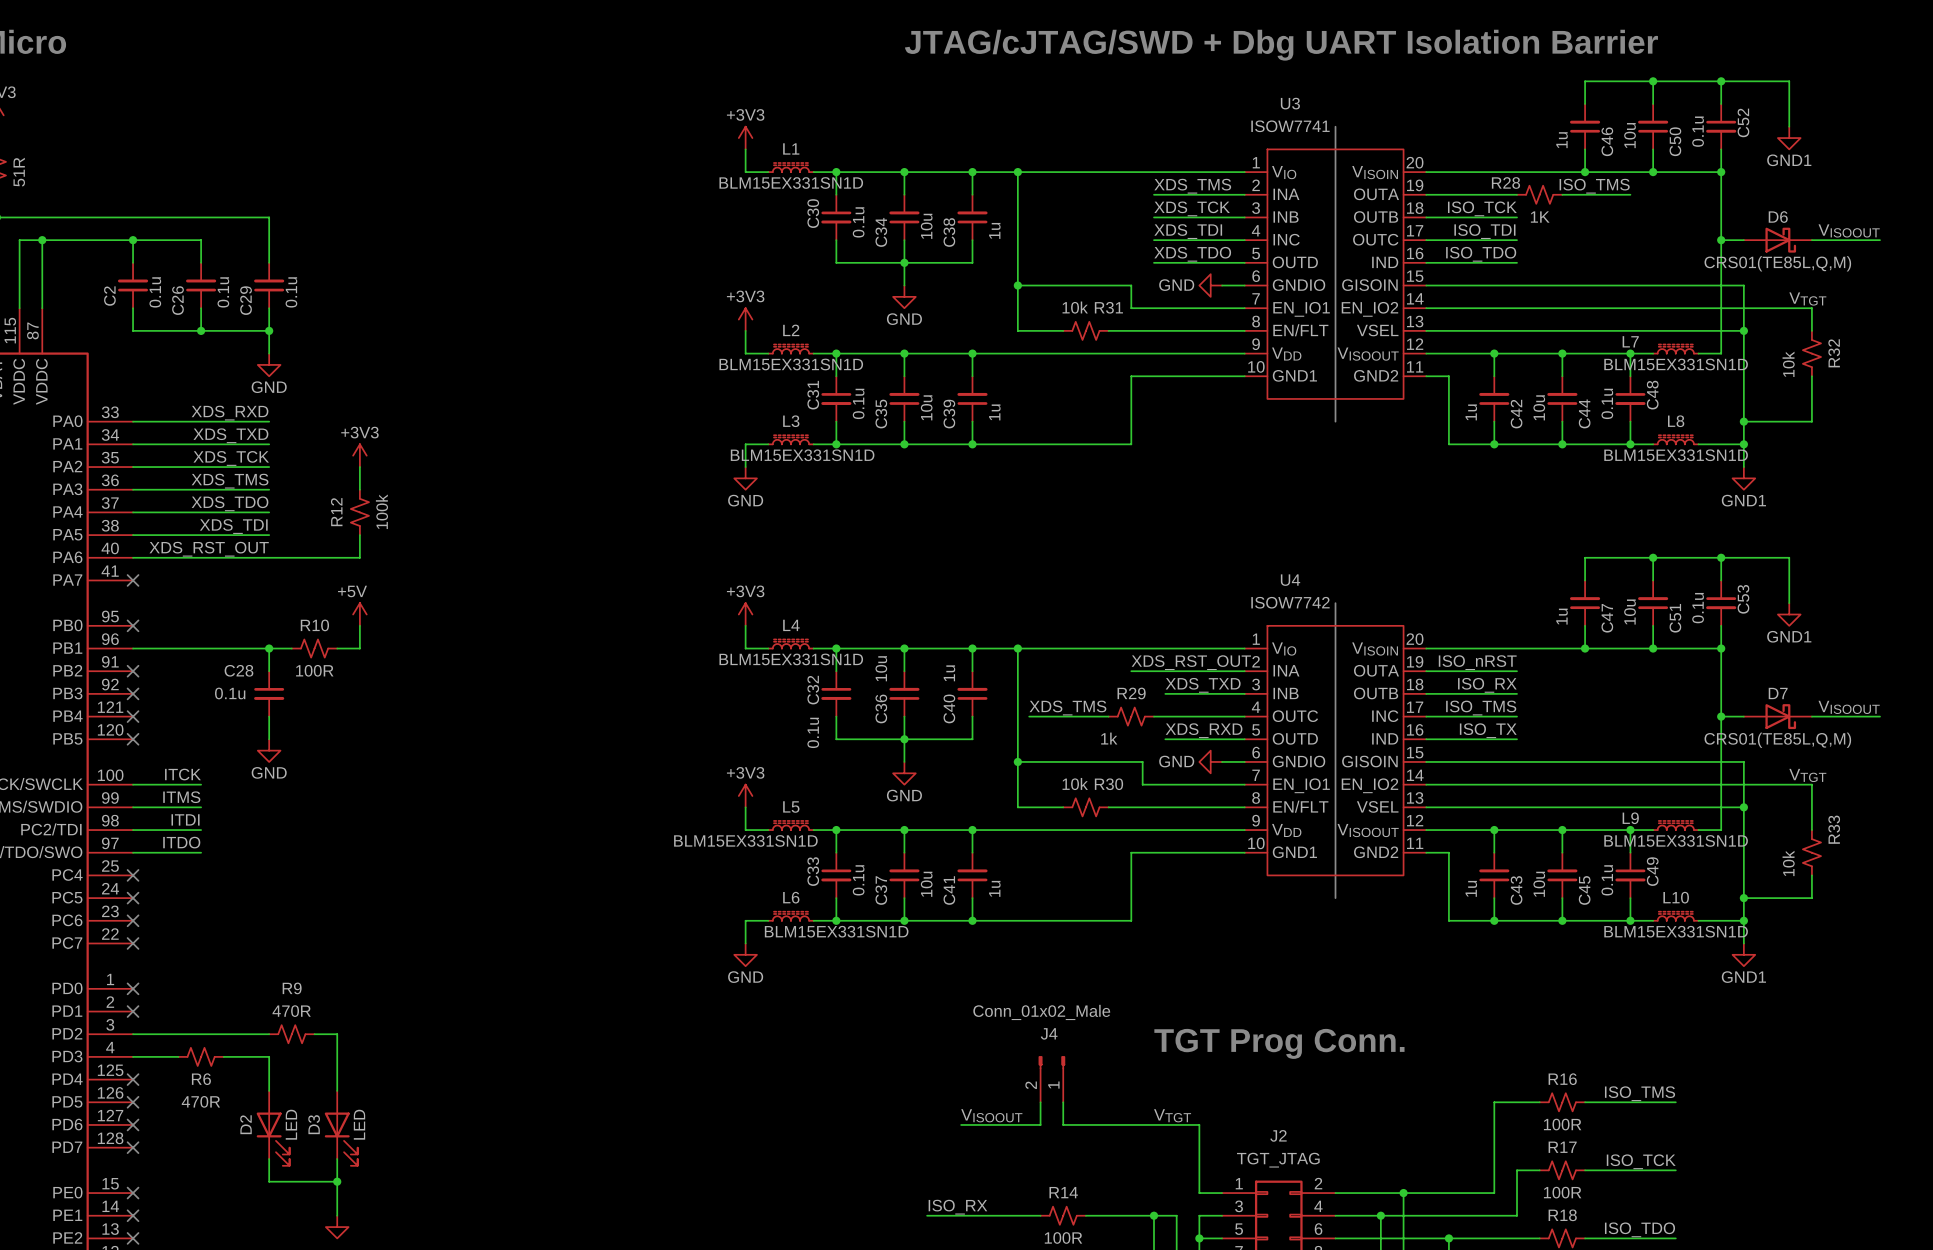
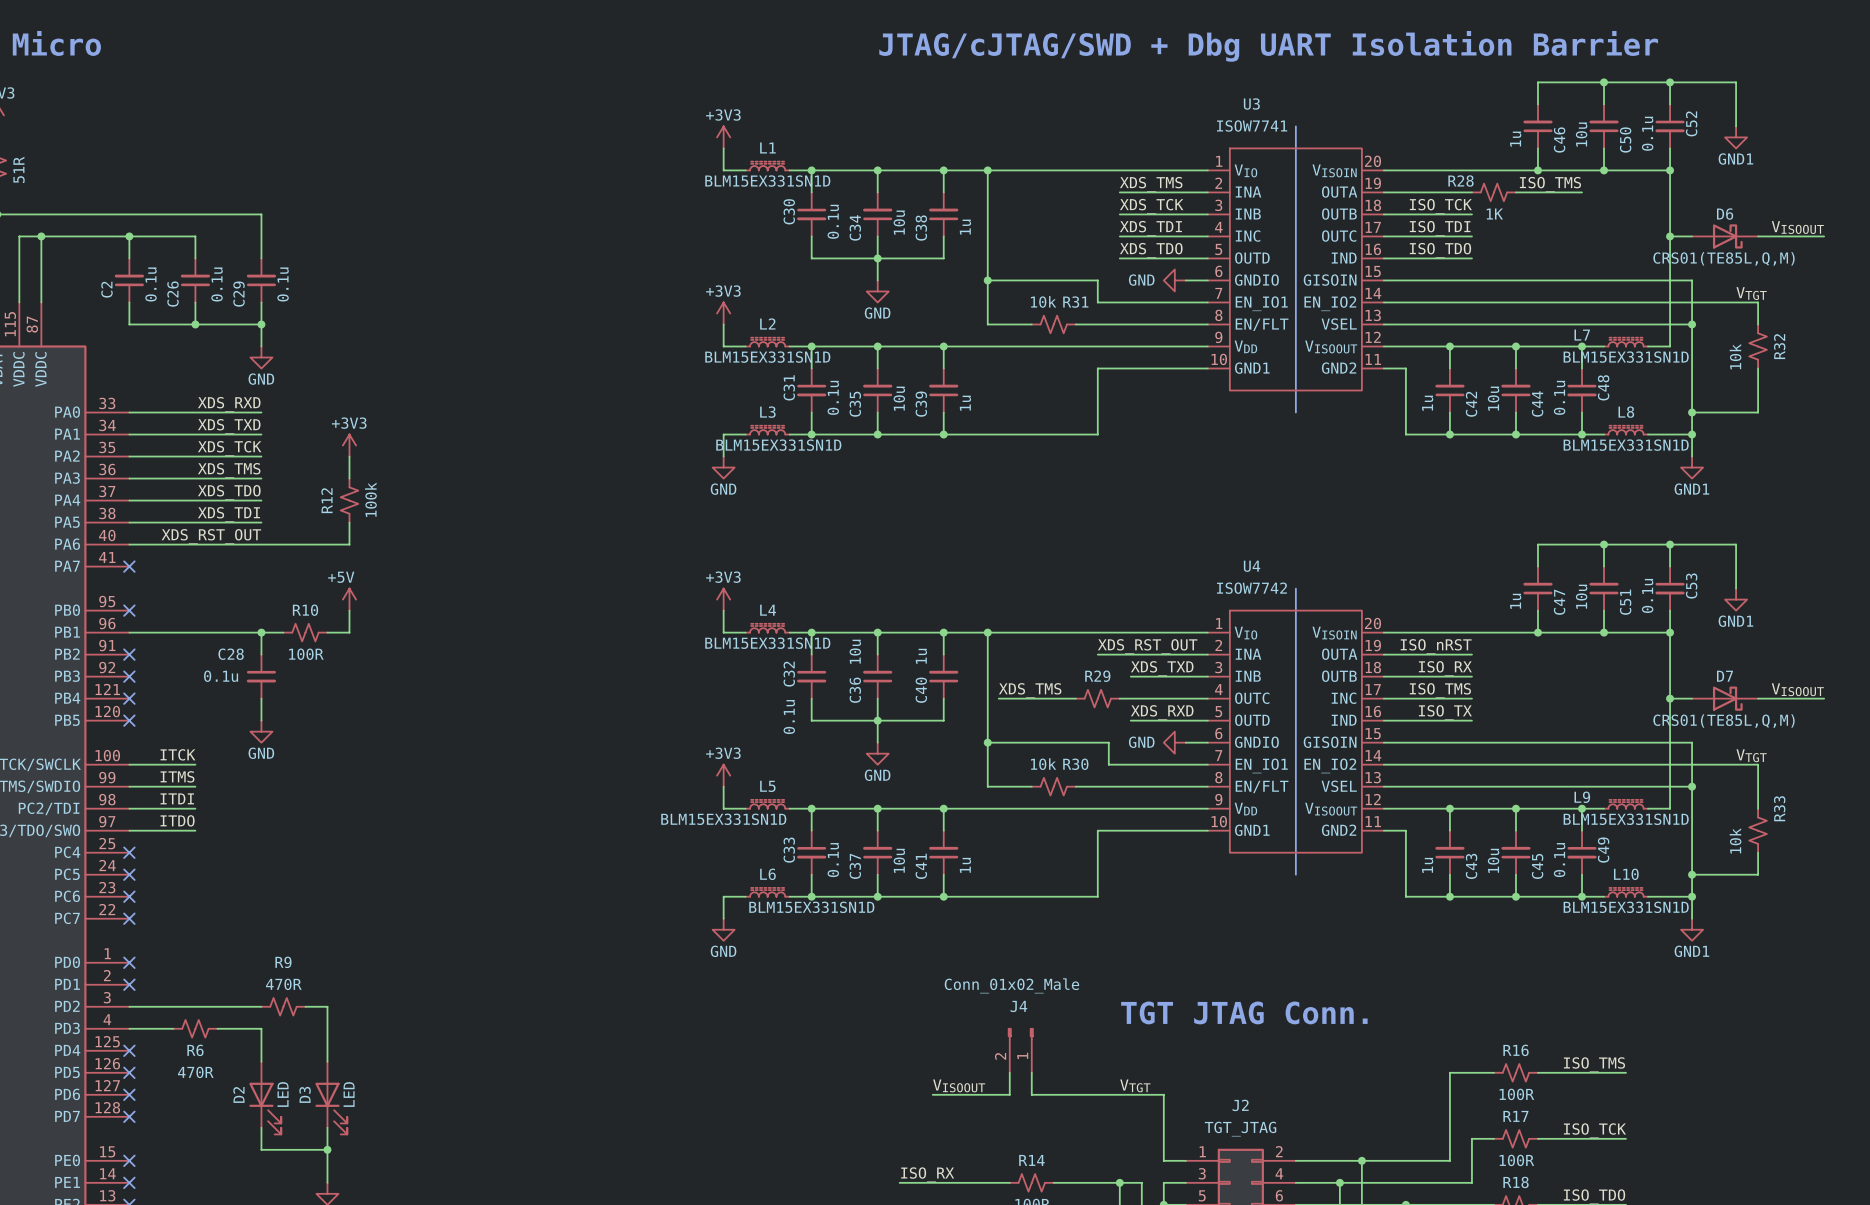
R29 value: 1k (1109, 738) -> none
text: TGT Prog Conn. (1279, 1043) -> TGT JTAG Conn. (1244, 1012)

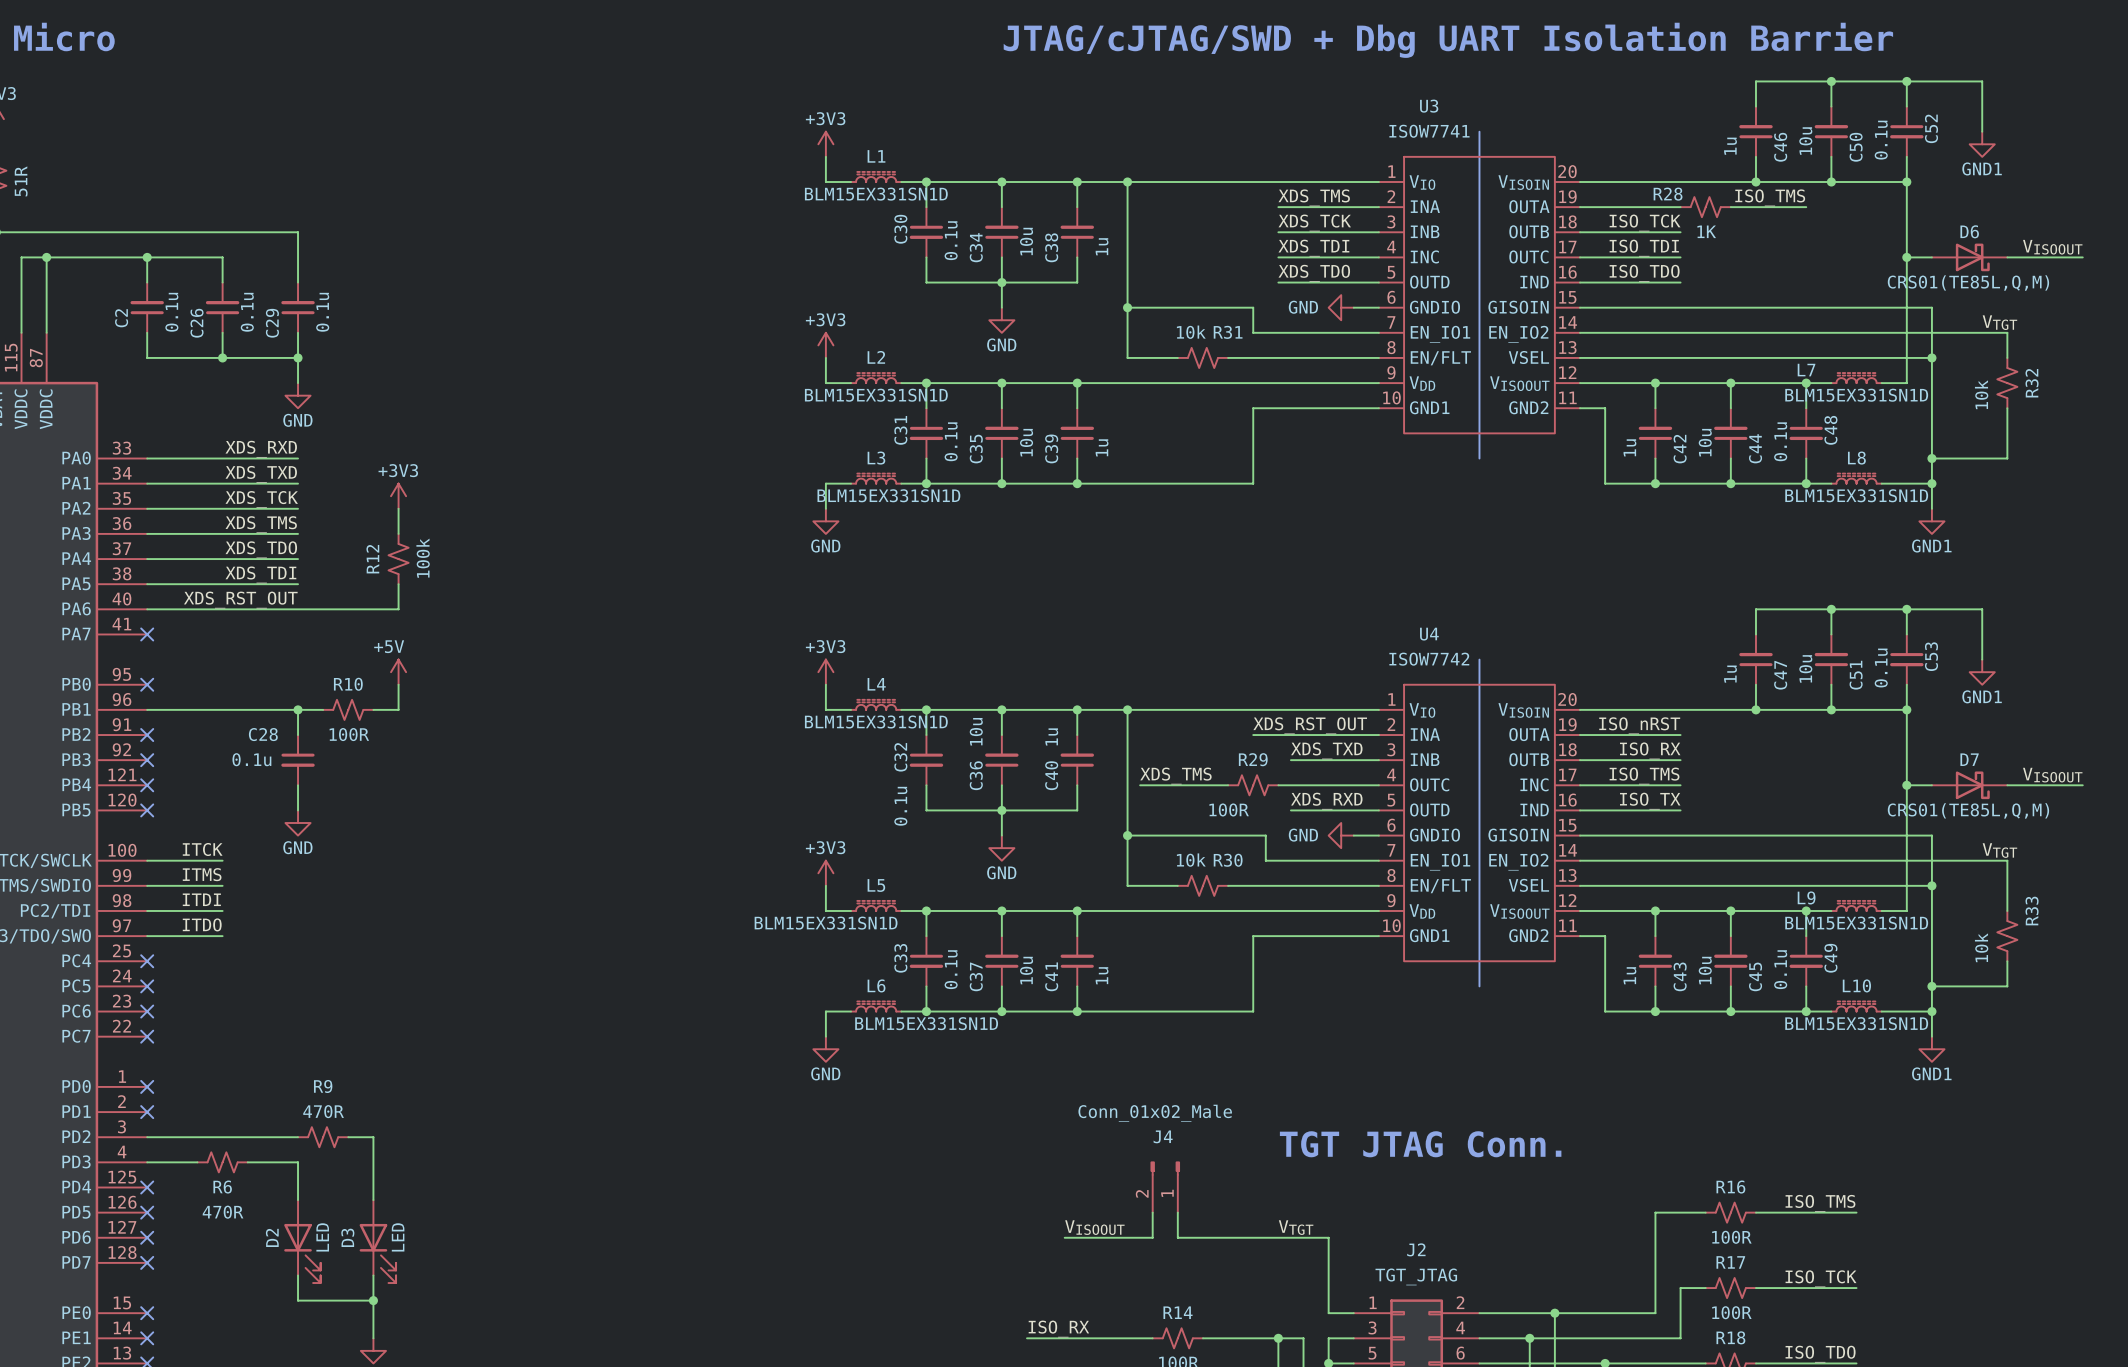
R29 value: none -> 100R (1229, 809)

